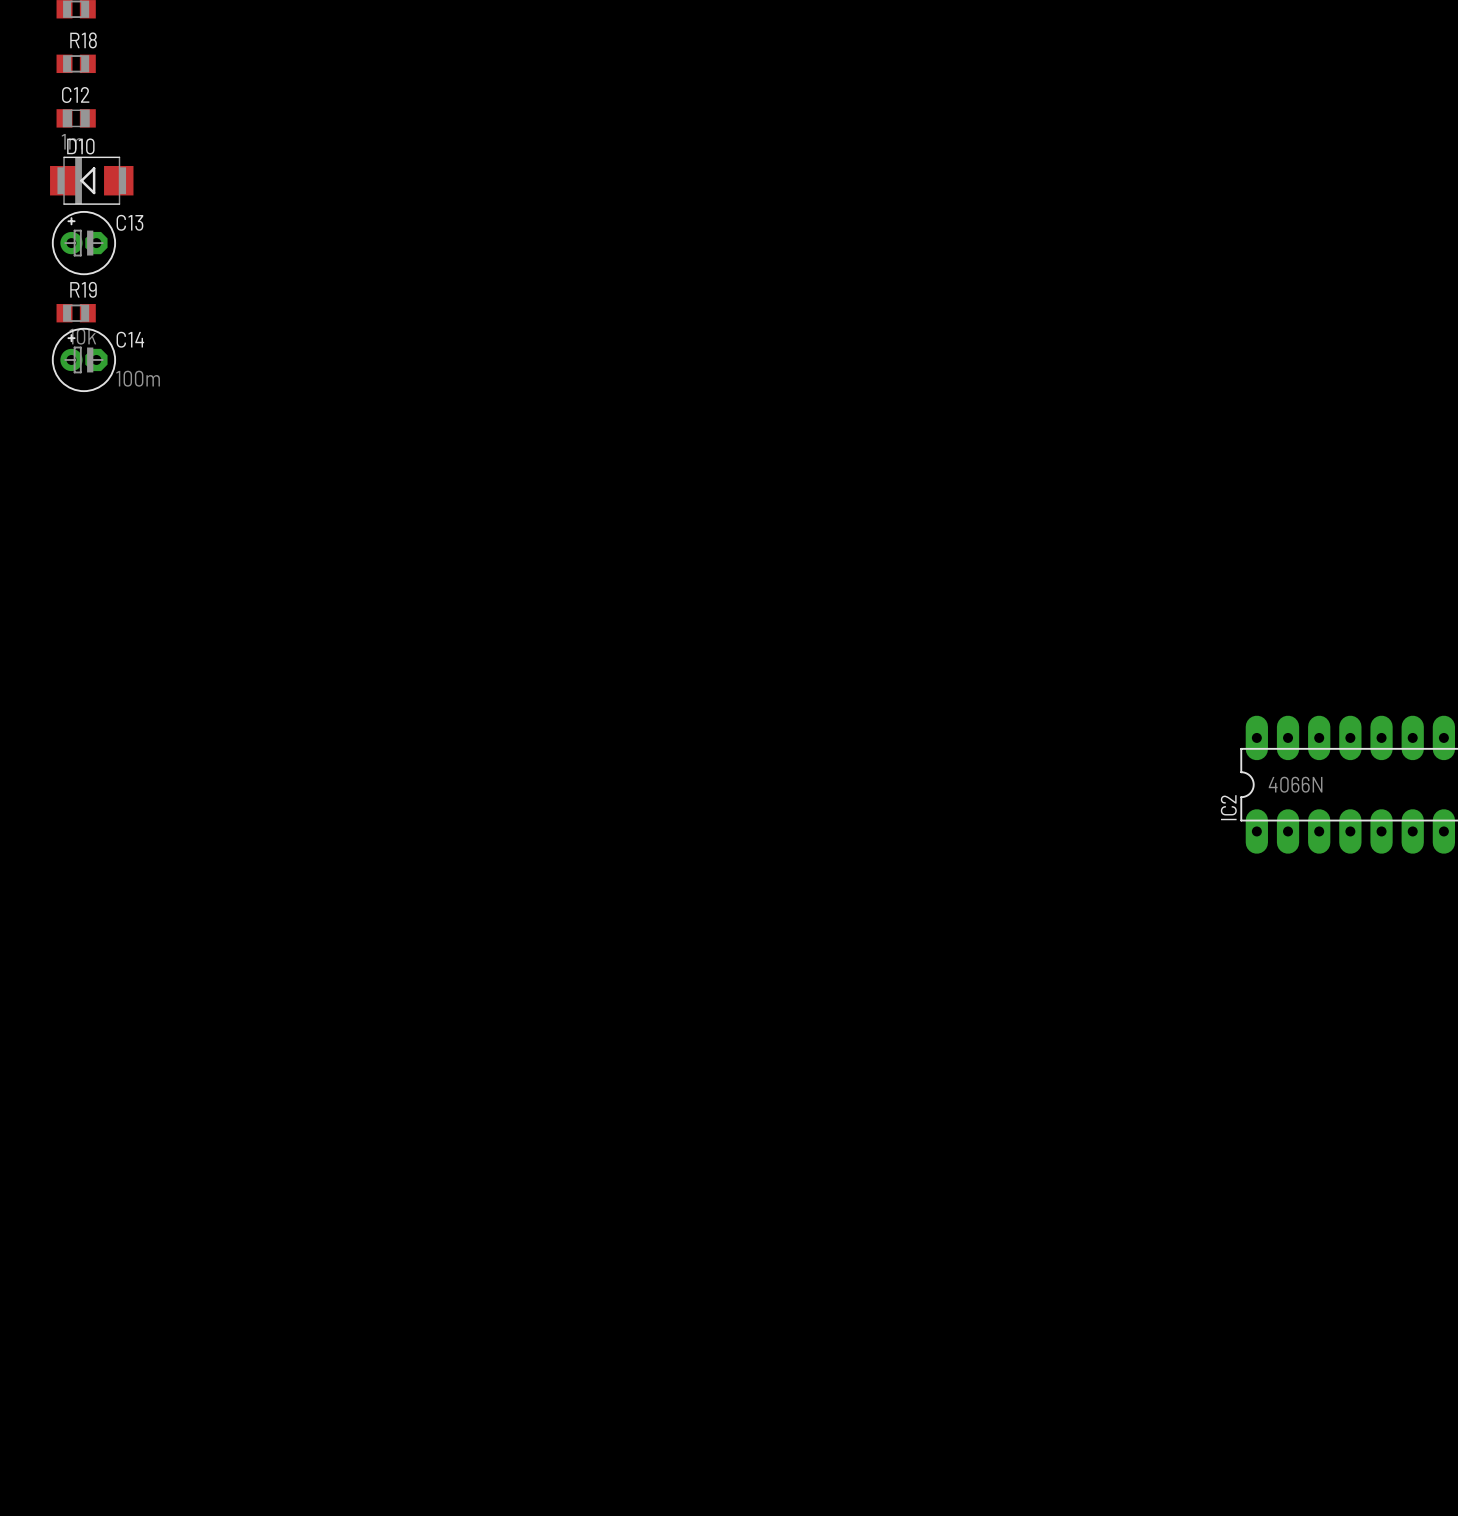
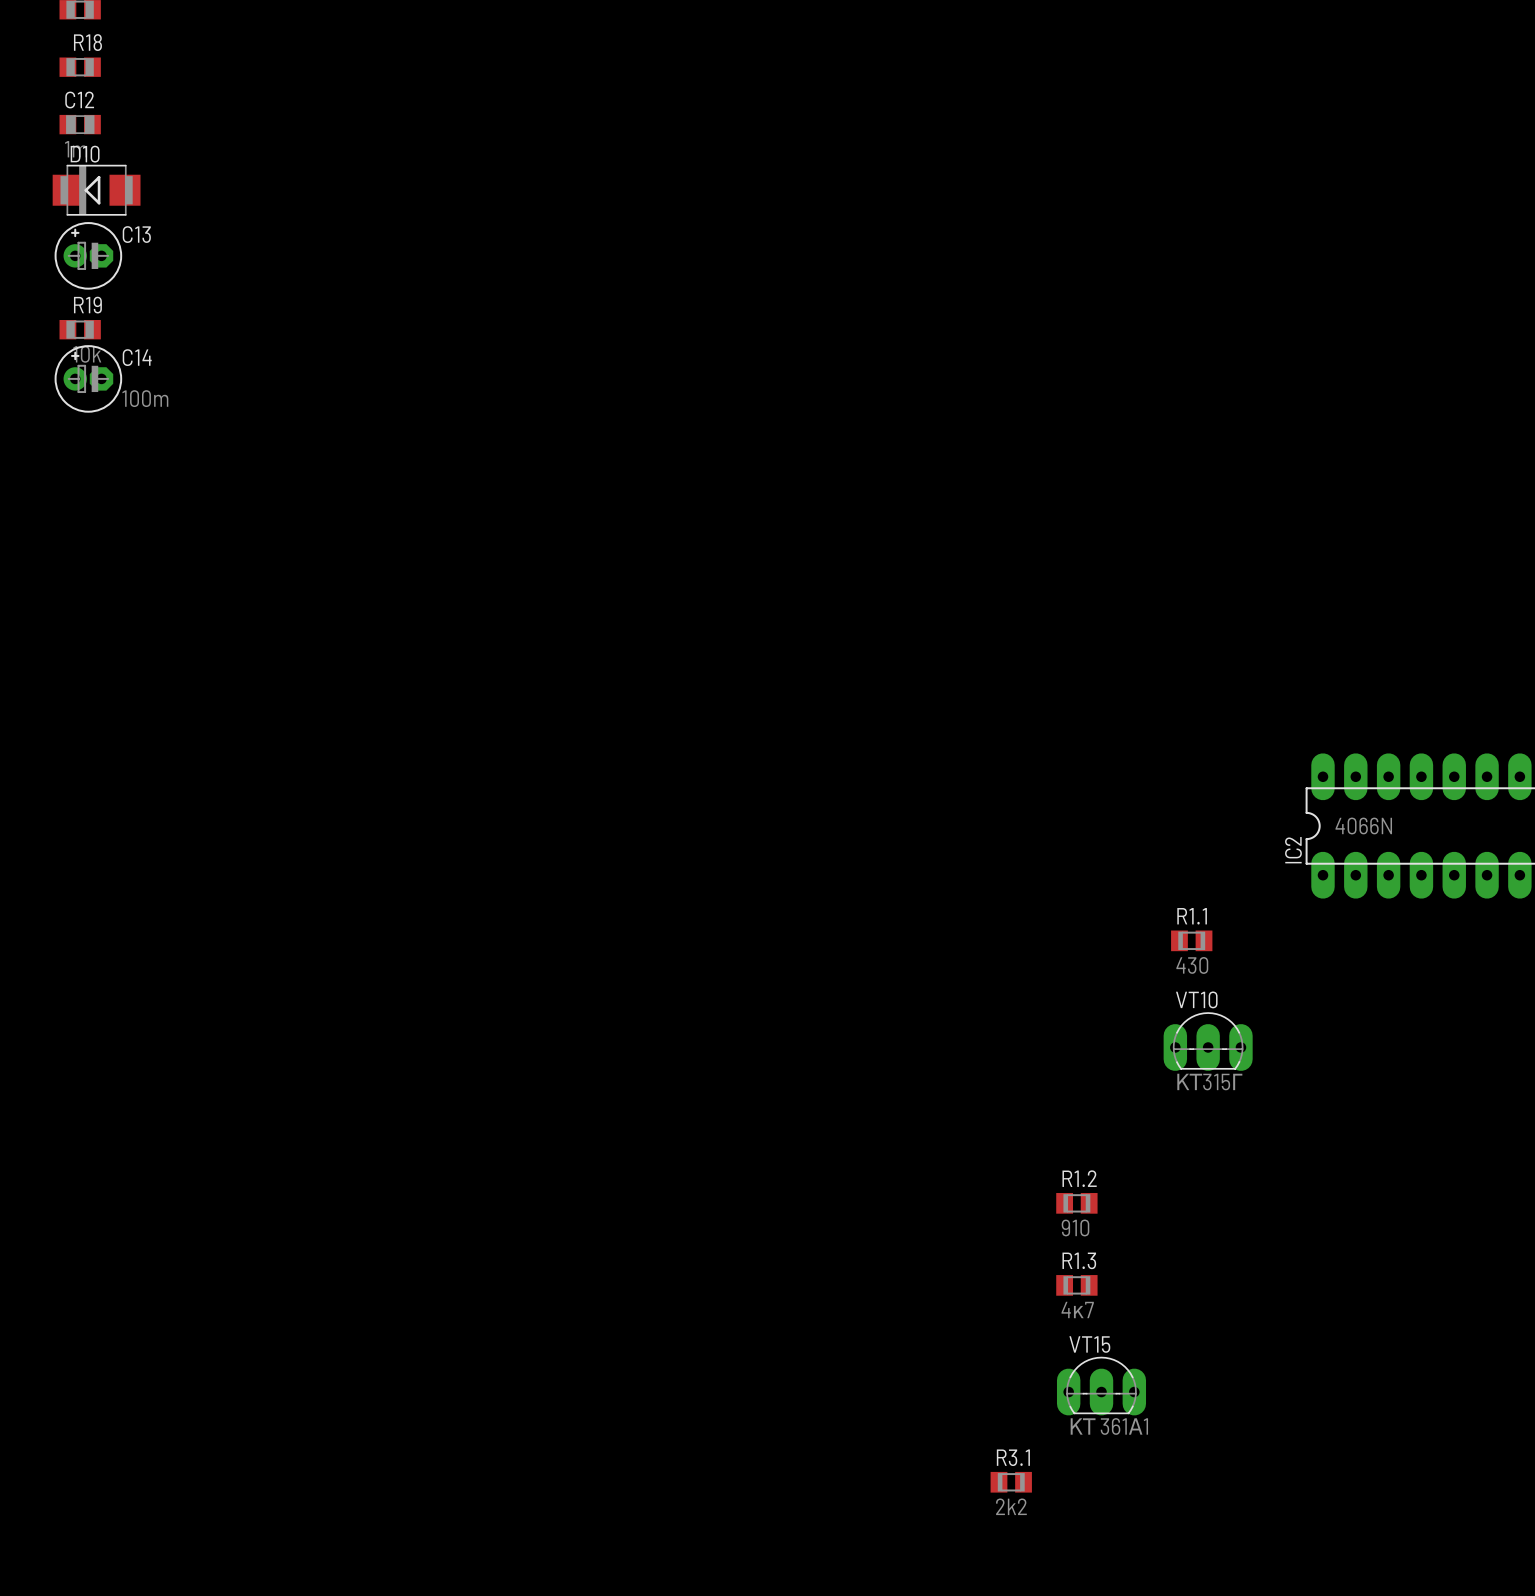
R1.1: none -> 430 (1191, 940)
VT10: none -> КТ315Г (1208, 1041)
R1.2: none -> 910 (1076, 1203)
R1.3: none -> 4к7 (1076, 1285)
VT15: none -> КТ 361А1 (1101, 1386)
R3.1: none -> 2k2 (1011, 1482)

